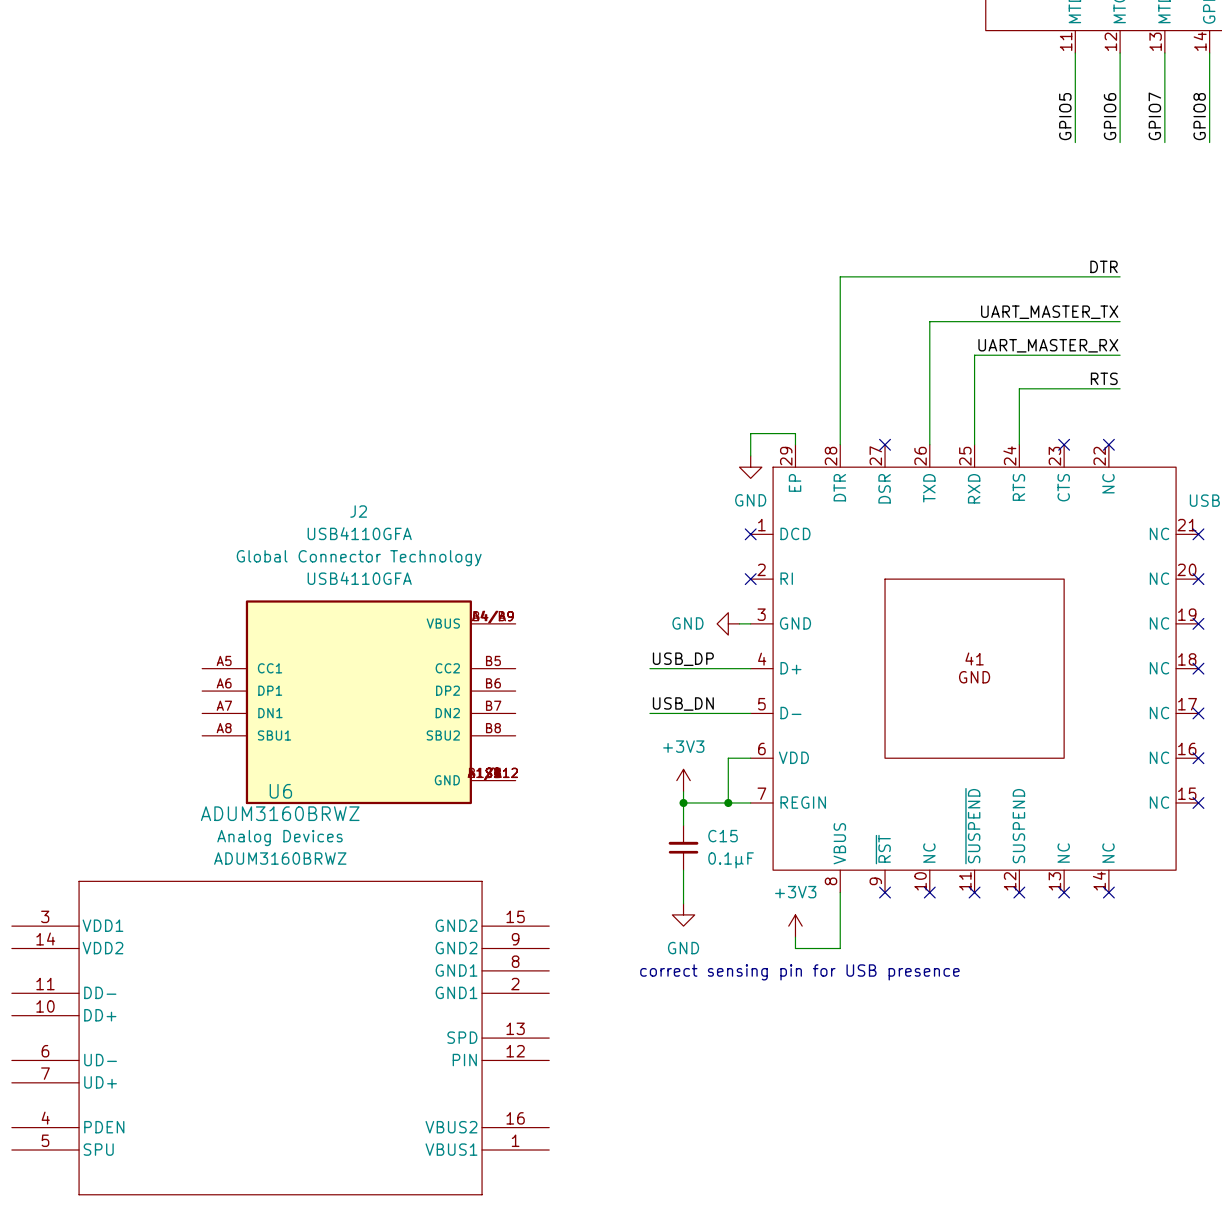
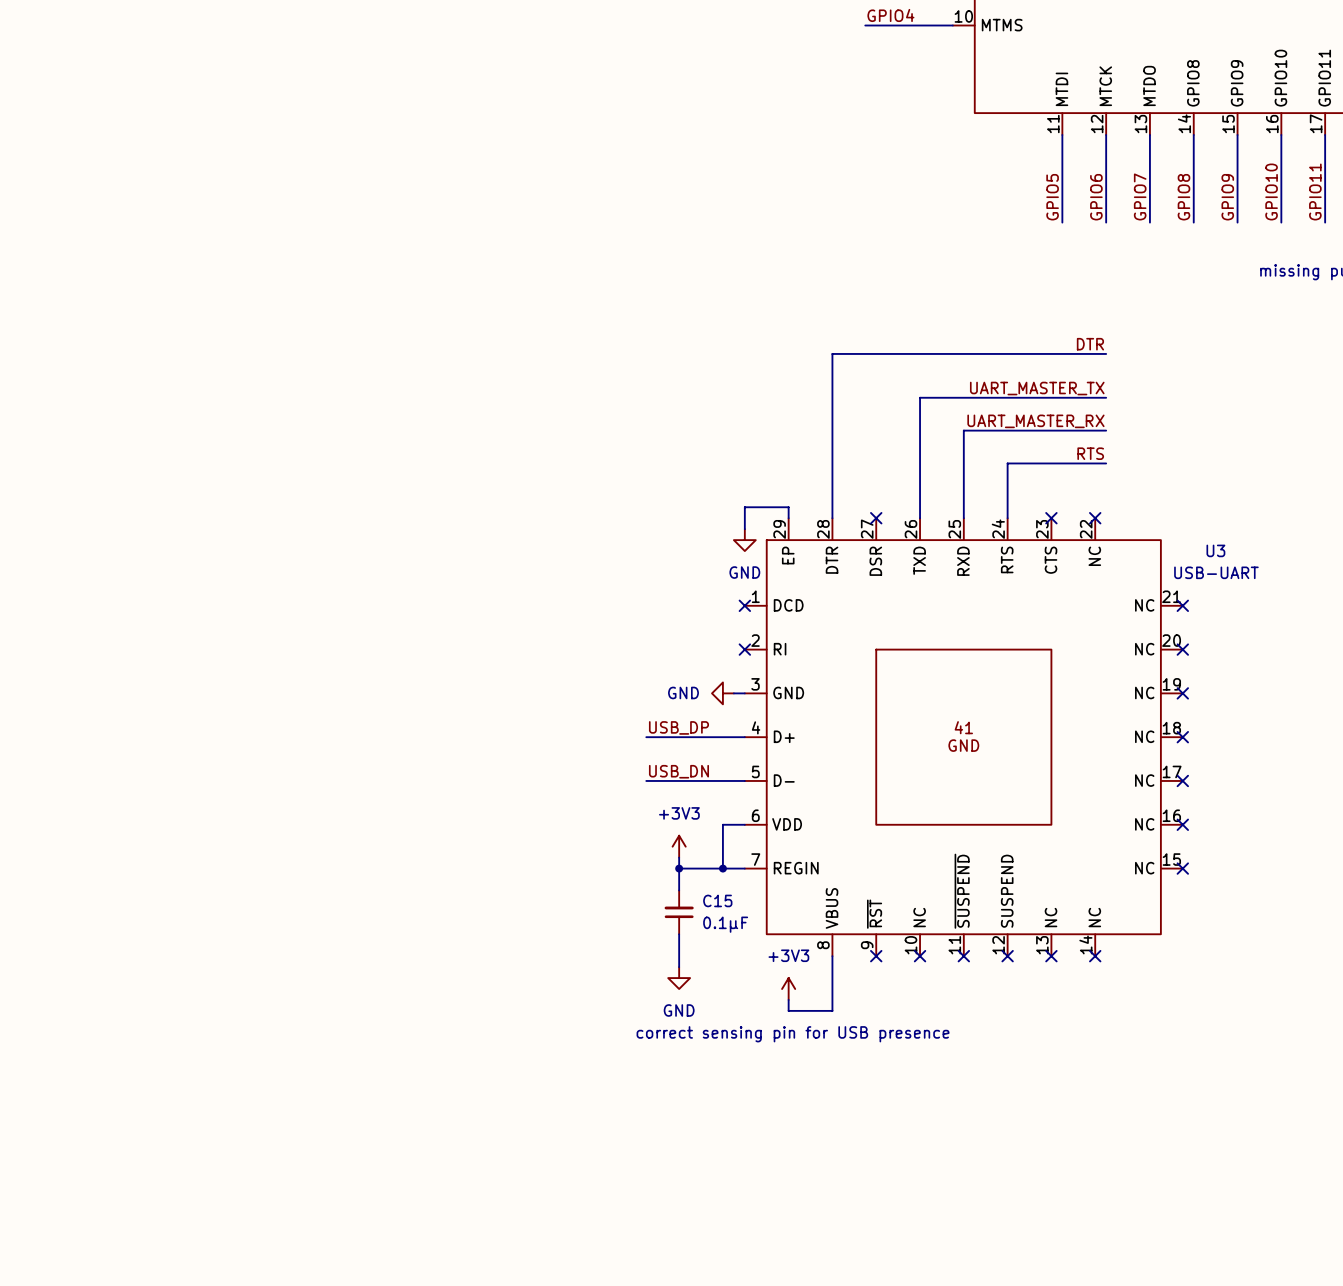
J2: USB4110GFA (358, 702) -> none
U6: ADUM3160BRWZ (280, 1038) -> none

